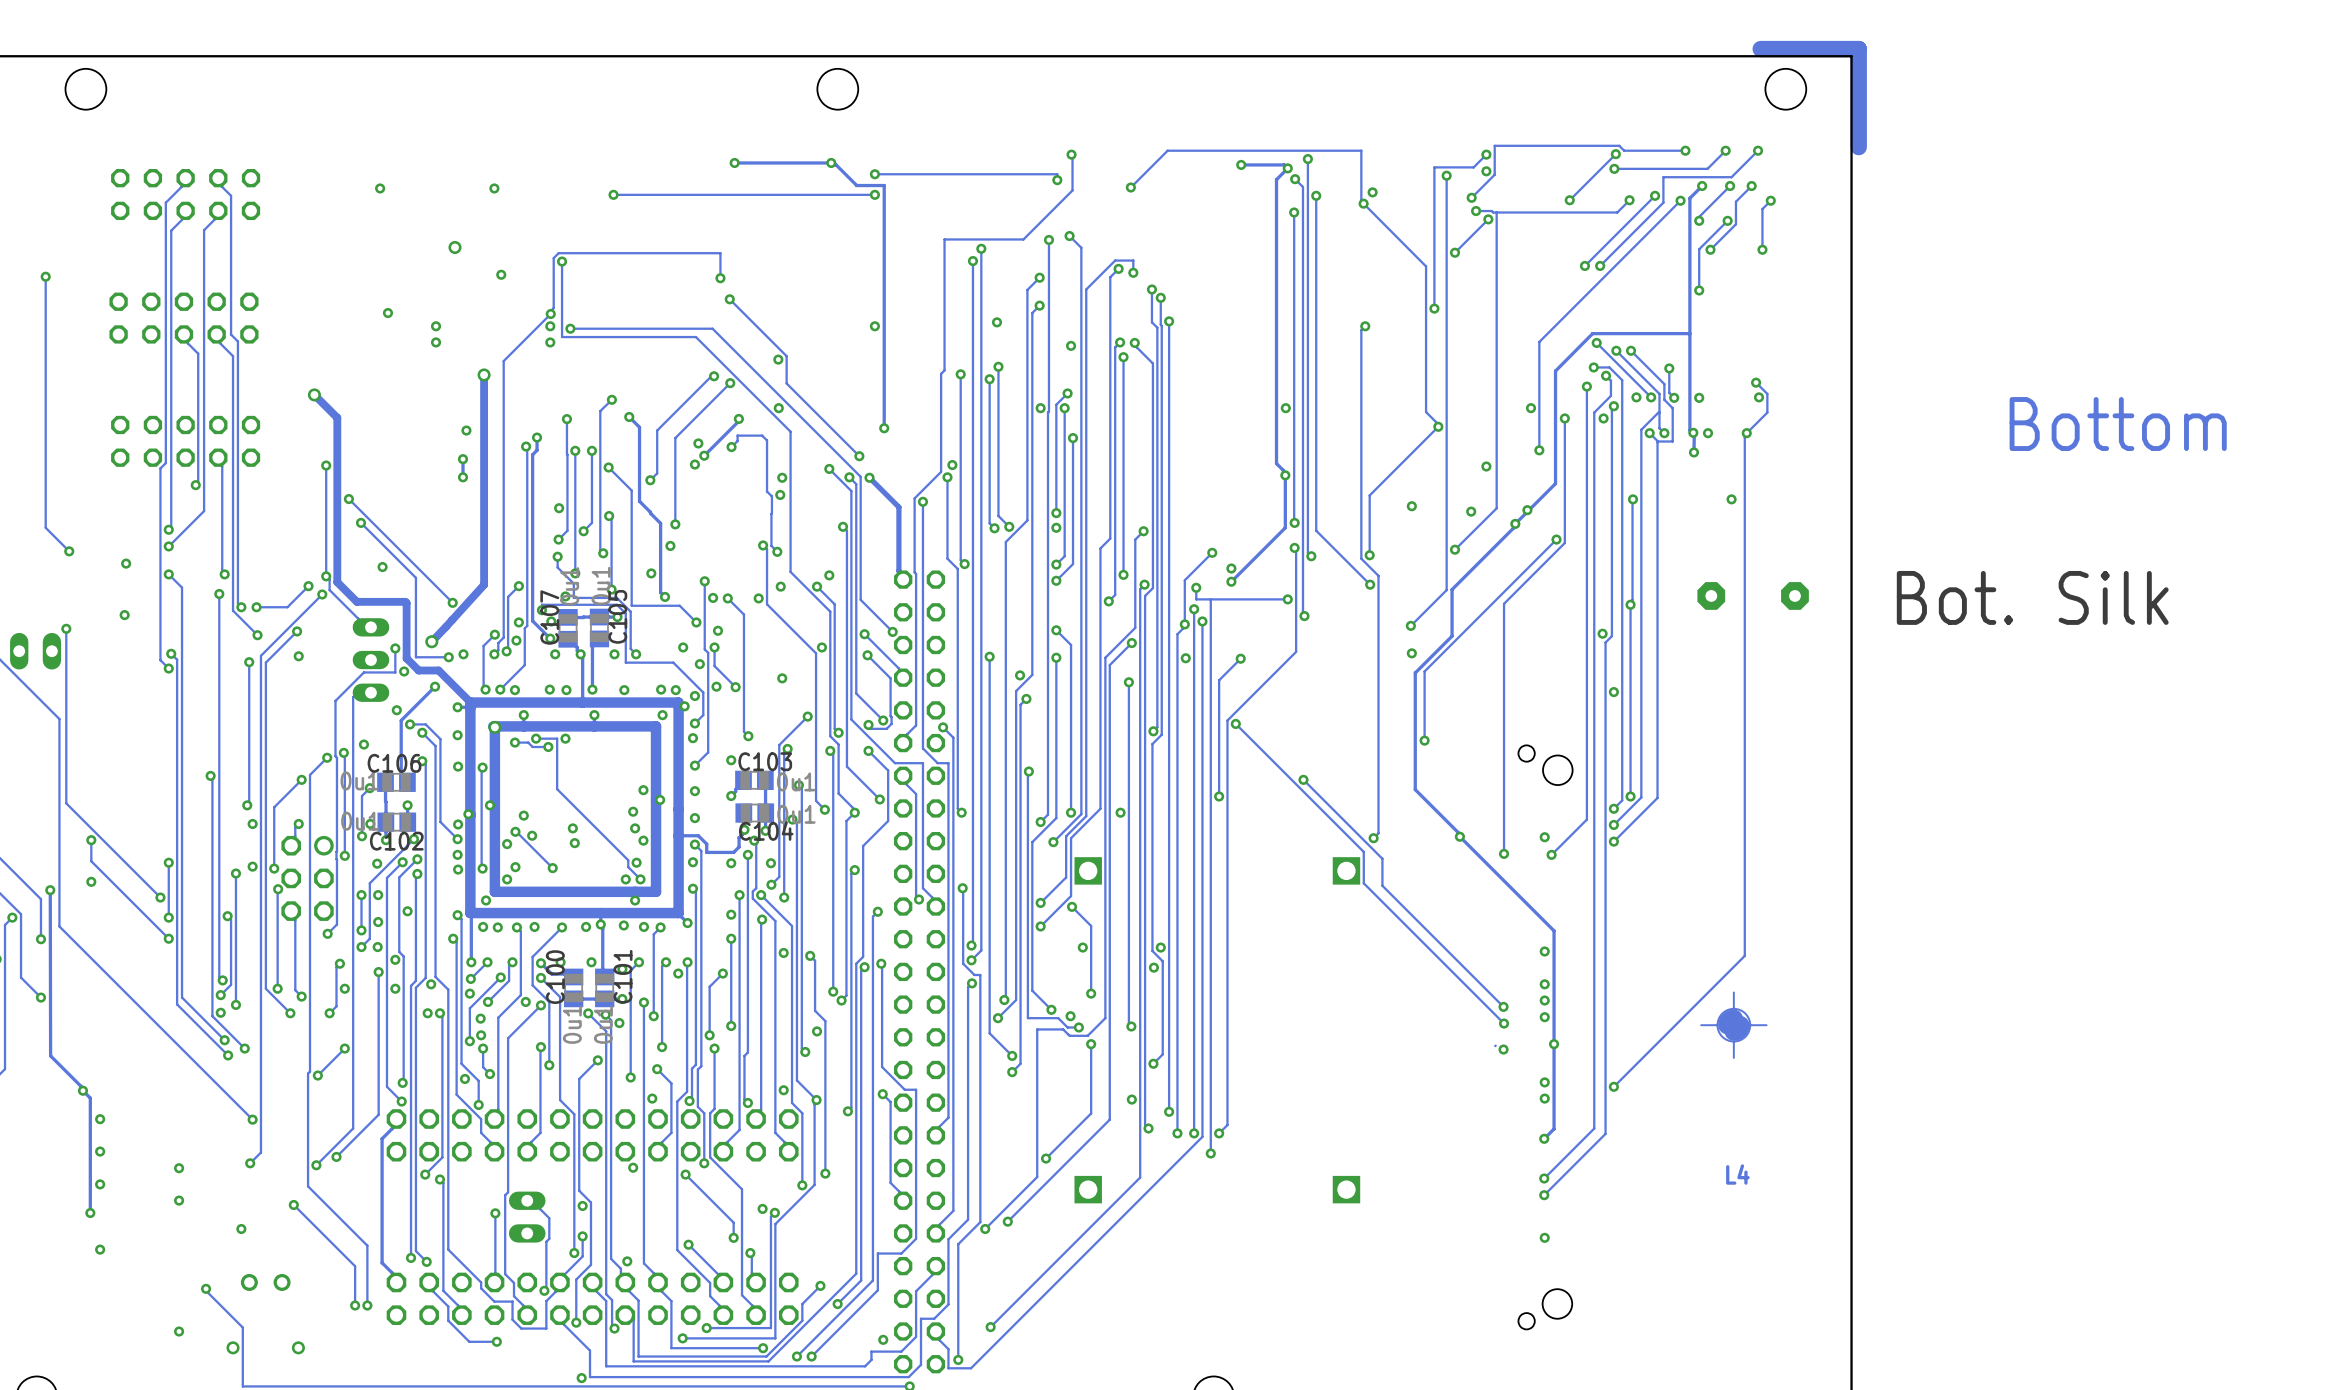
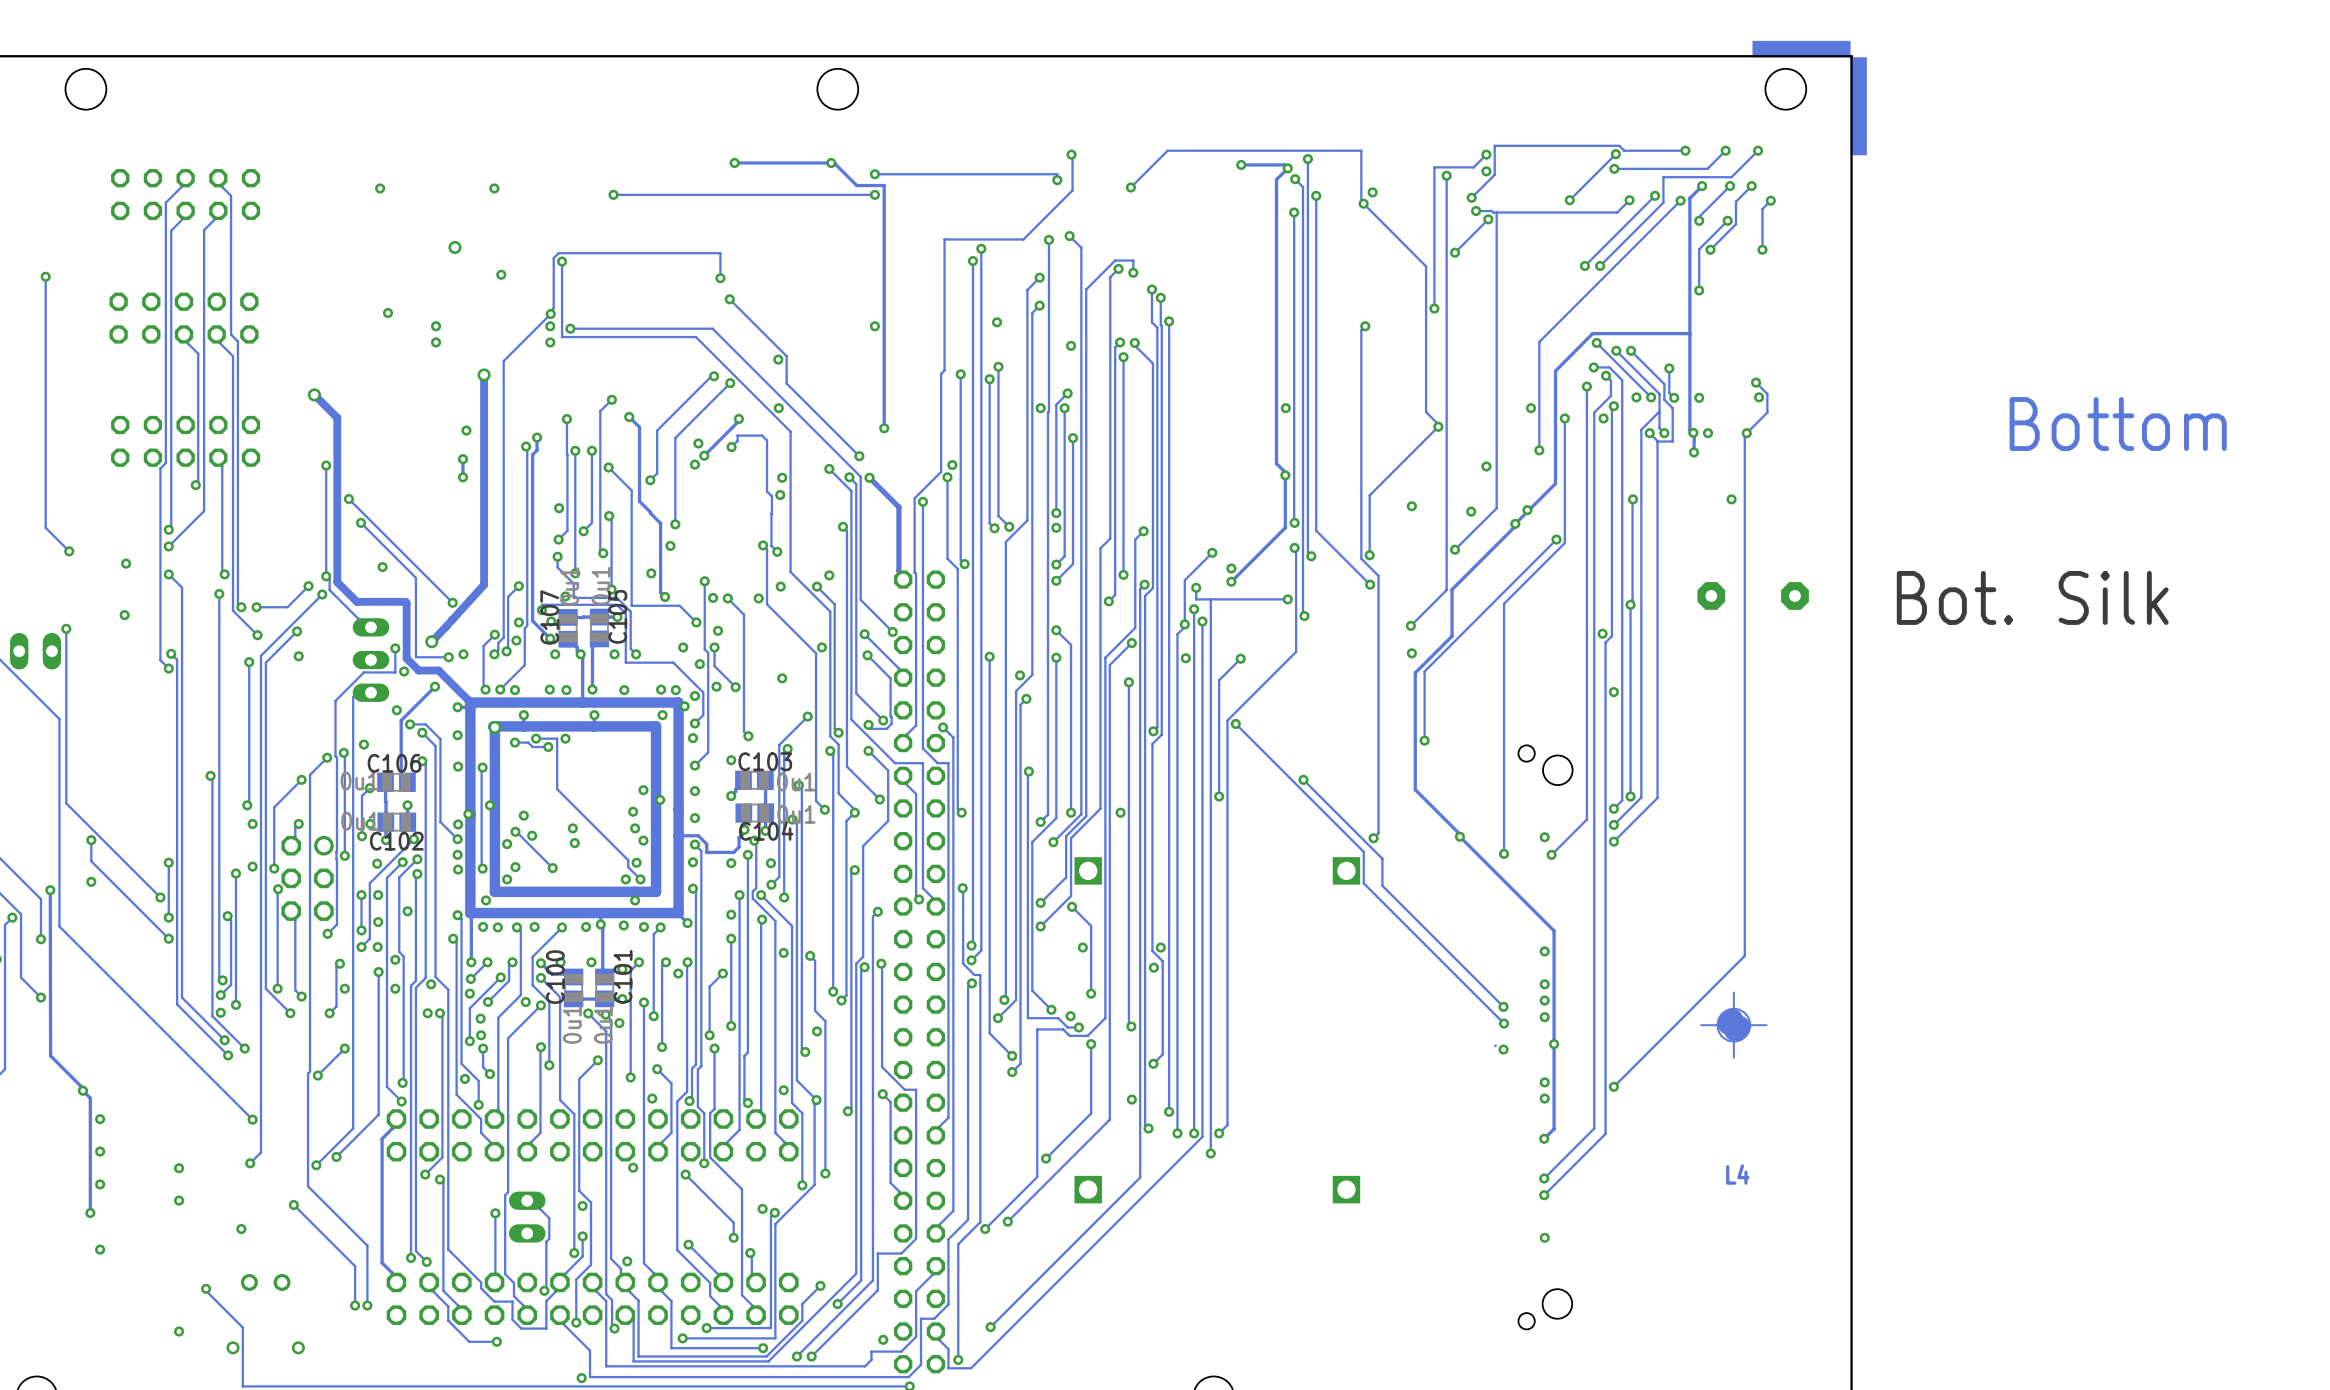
drawing shape: [1752, 40, 1867, 156] -> [1752, 40, 1867, 156]

